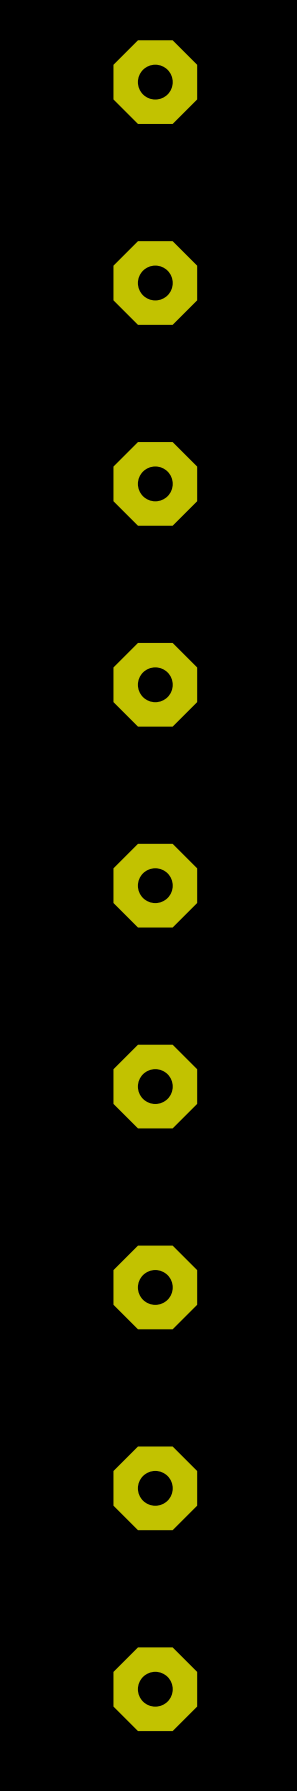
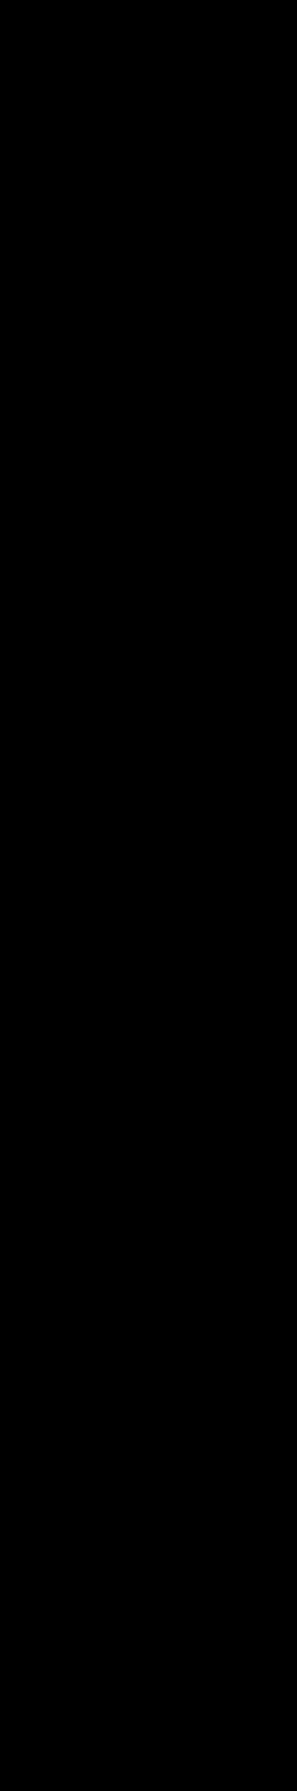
part: (155, 82) -> none
part: (155, 283) -> none
part: (155, 483) -> none
part: (155, 684) -> none
part: (155, 885) -> none
part: (155, 1086) -> none
part: (155, 1287) -> none
part: (155, 1488) -> none
part: (155, 1689) -> none

